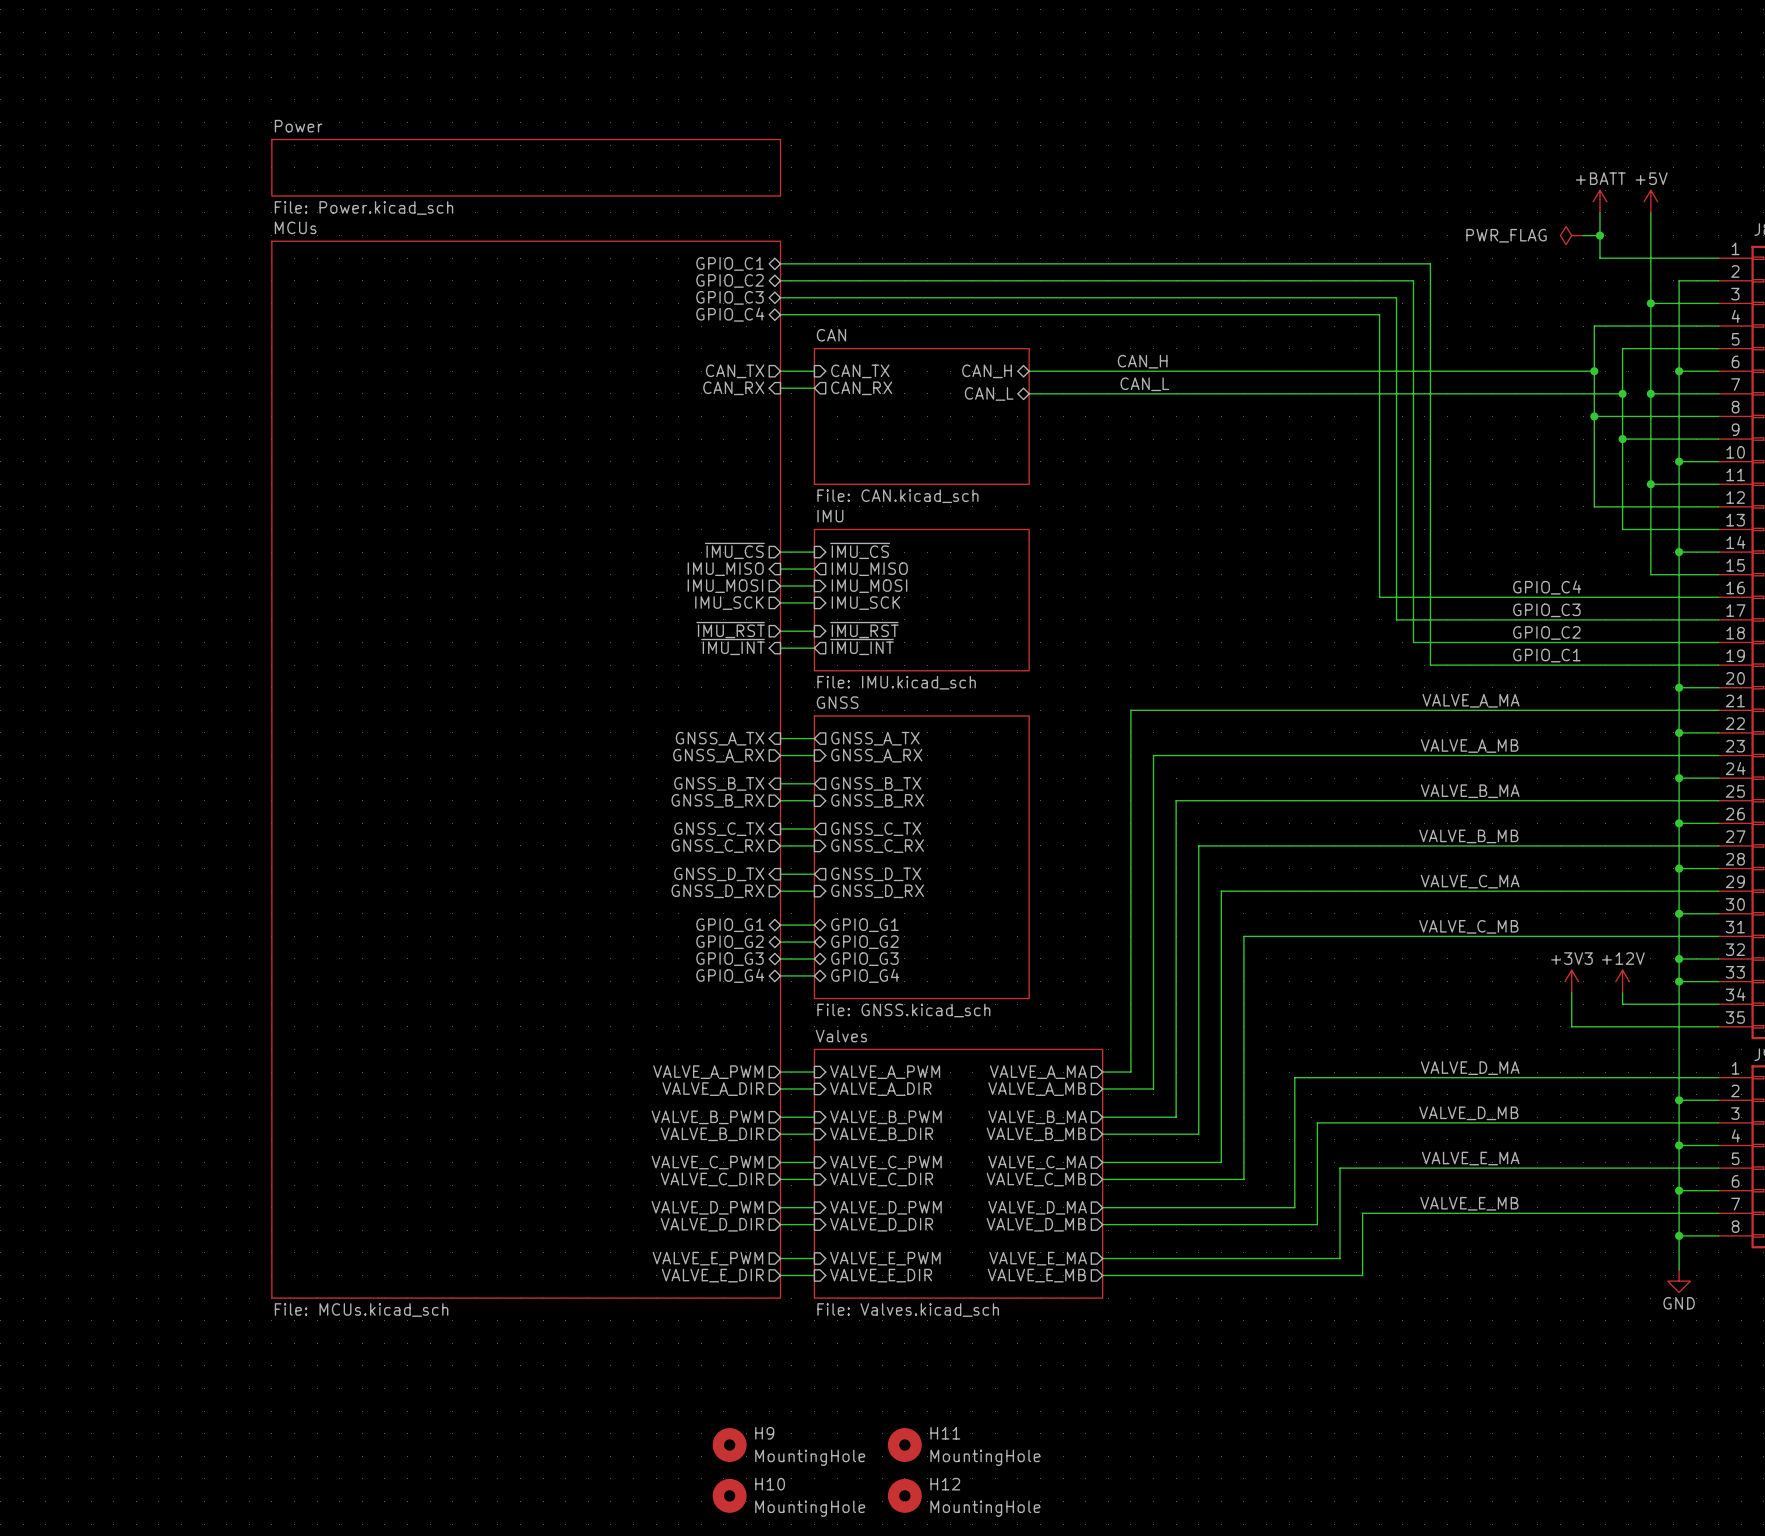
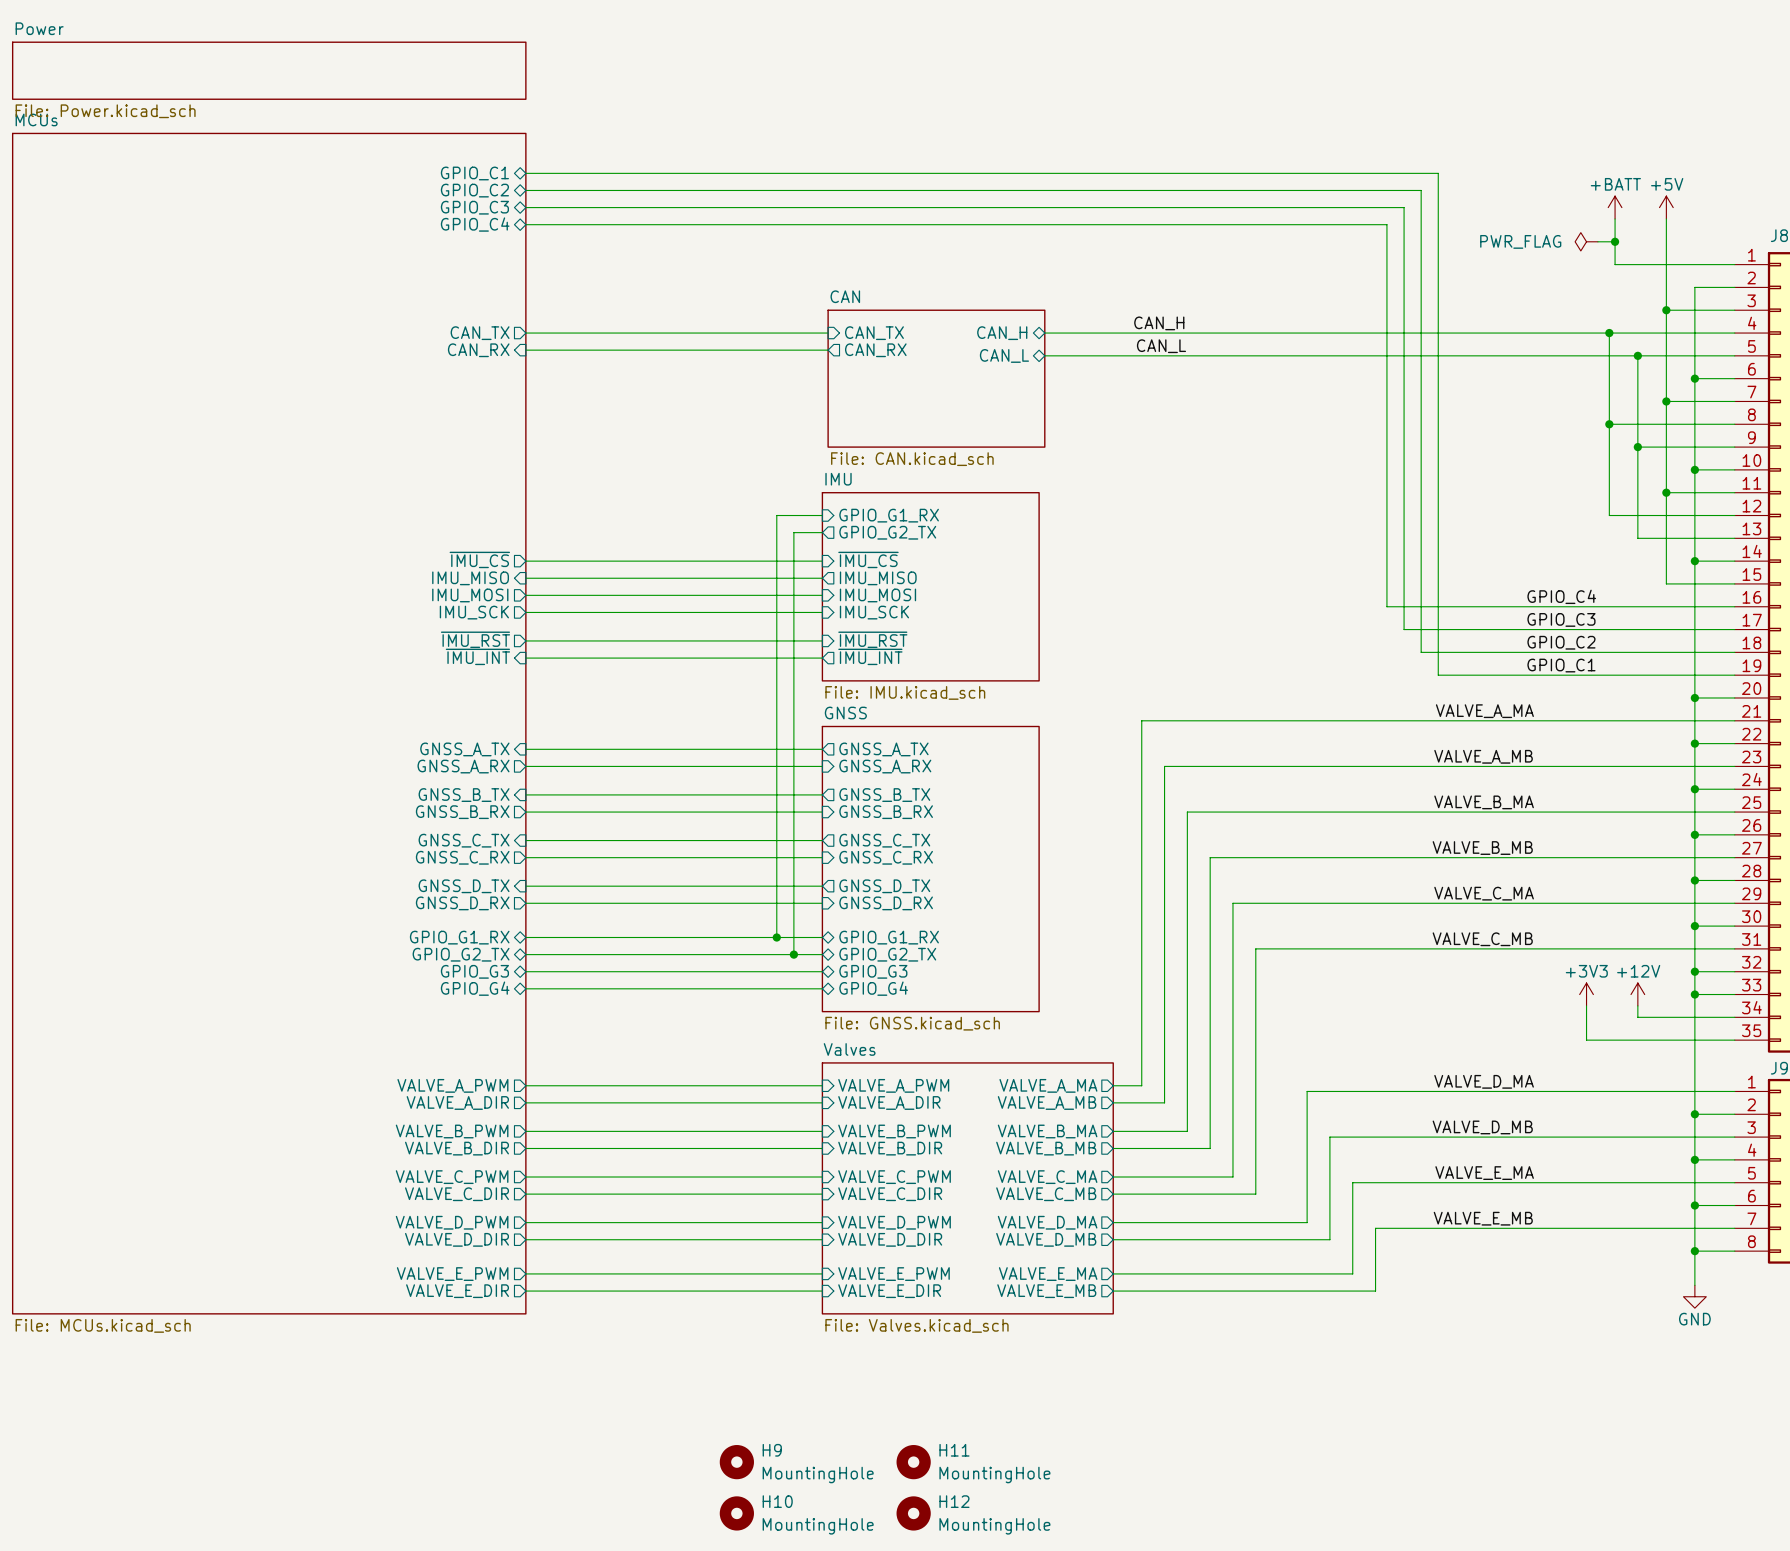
sheet Power: none -> File: Power.kicad_sch (269, 70)
sheet pin: none -> GPIO_C1 (474, 173)
sheet Power: File: Power.kicad_sch (526, 167) -> none
sheet pin: none -> GPIO_C2 (474, 190)
sheet pin: none -> GPIO_C3 (474, 207)
sheet pin: none -> GPIO_C4 (475, 224)
sheet pin: GPIO_C1 (730, 263) -> none
wire: (780, 263) (1430, 263) (1430, 665) -> (525, 173) (1438, 173) (1438, 675) (1443, 675)
sheet pin: GPIO_C2 (730, 280) -> none
wire: (780, 280) (1413, 280) (1413, 642) -> (525, 190) (1421, 190) (1421, 652) (1426, 652)
sheet pin: GPIO_C3 (730, 297) -> none
wire: (780, 297) (1396, 297) (1396, 619) -> (525, 207) (1404, 207) (1404, 629) (1409, 629)
sheet pin: GPIO_C4 (730, 314) -> none
wire: (780, 314) (1379, 314) (1379, 597) -> (525, 224) (1386, 224) (1386, 606) (1392, 606)
sheet pin: none -> CAN_TX (480, 333)
wire: none -> (525, 333) (828, 333)
sheet pin: none -> CAN_TX (874, 333)
wire: none -> (1044, 333) (1609, 333)
junction: none -> (1609, 333)
wire: none -> (525, 350) (828, 350)
sheet pin: none -> CAN_RX (478, 350)
sheet pin: none -> CAN_RX (875, 350)
wire: none -> (1044, 355) (1637, 355)
junction: none -> (1637, 355)
label position: CAN_H (1142, 361) -> CAN_H (1159, 323)
sheet pin: CAN_TX (735, 371) -> none
wire: (780, 371) (814, 371) -> none
sheet pin: CAN_TX (860, 371) -> none
sheet pin position: CAN_H (987, 371) -> CAN_H (1002, 333)
wire: (1029, 371) (1594, 371) -> none
junction: (1594, 371) -> none
label position: CAN_L (1144, 384) -> CAN_L (1161, 346)
sheet pin: CAN_RX (733, 388) -> none
wire: (780, 388) (814, 388) -> none
sheet pin: CAN_RX (861, 388) -> none
sheet pin position: CAN_L (989, 393) -> CAN_L (1004, 355)
wire: (1029, 393) (1622, 393) -> none
junction: (1622, 393) -> none
sheet CAN position: (921, 416) -> (936, 378)
wire: none -> (822, 515) (776, 515) (776, 937)
sheet pin: none -> GPIO_G1_RX (889, 515)
wire: none -> (822, 532) (793, 532) (793, 954)
sheet pin: none -> GPIO_G2_TX (887, 532)
sheet pin: none -> ~{IMU_CS} (479, 559)
sheet pin: ~{IMU_CS} (734, 550) -> none
wire: none -> (525, 561) (788, 561)
sheet pin: none -> IMU_MISO (470, 578)
wire: none -> (525, 578) (788, 578)
sheet pin: IMU_MISO (725, 569) -> none
sheet IMU: none -> File: IMU.kicad_sch (930, 586)
wire: none -> (525, 595) (788, 595)
sheet pin: none -> IMU_MOSI (470, 595)
sheet pin: IMU_MOSI (725, 586) -> none
sheet IMU: File: IMU.kicad_sch (921, 600) -> none
wire: none -> (525, 612) (788, 612)
sheet pin: none -> IMU_SCK (474, 612)
sheet pin: IMU_SCK (729, 603) -> none
sheet pin: none -> ~{IMU_RST} (475, 639)
sheet pin: ~{IMU_RST} (730, 630) -> none
wire: none -> (525, 640) (788, 640)
sheet pin: none -> ~{IMU_INT} (477, 656)
sheet pin: ~{IMU_INT} (732, 646) -> none
wire: none -> (525, 658) (788, 658)
sheet MCUs: none -> File: MCUs.kicad_sch (269, 723)
sheet pin: none -> GNSS_A_TX (464, 749)
wire: none -> (525, 749) (788, 749)
sheet pin: GNSS_A_TX (720, 738) -> none
sheet pin: none -> GNSS_A_RX (463, 766)
wire: none -> (525, 766) (788, 766)
sheet pin: GNSS_A_RX (718, 755) -> none
sheet MCUs: File: MCUs.kicad_sch (526, 769) -> none
sheet pin: none -> GNSS_B_TX (464, 795)
wire: none -> (525, 794) (788, 794)
sheet pin: GNSS_B_TX (719, 783) -> none
sheet pin: none -> GNSS_B_RX (462, 812)
wire: none -> (525, 812) (788, 812)
sheet pin: GNSS_B_RX (717, 800) -> none
sheet pin: none -> GNSS_C_TX (464, 840)
wire: none -> (525, 840) (788, 840)
sheet pin: GNSS_C_TX (719, 829) -> none
wire: none -> (525, 857) (788, 857)
sheet pin: none -> GNSS_C_RX (462, 857)
sheet pin: GNSS_C_RX (717, 846) -> none
sheet pin: none -> GNSS_D_TX (464, 886)
wire: none -> (525, 886) (788, 886)
sheet pin: GNSS_D_TX (719, 874) -> none
sheet pin: none -> GNSS_D_RX (462, 903)
wire: none -> (525, 903) (788, 903)
sheet pin: GNSS_D_RX (717, 891) -> none
sheet pin: none -> GPIO_G1_RX (459, 937)
wire: none -> (525, 937) (788, 937)
sheet pin: GPIO_G1 (730, 925) -> none
junction: none -> (776, 937)
sheet pin: GPIO_G1 (864, 925) -> GPIO_G1_RX (889, 937)
sheet pin: none -> GPIO_G2_TX (461, 954)
wire: none -> (525, 954) (788, 954)
sheet pin: GPIO_G2 (730, 942) -> none
junction: none -> (793, 954)
sheet pin: GPIO_G2 (864, 942) -> GPIO_G2_TX (887, 954)
wire: none -> (525, 971) (788, 971)
sheet pin: none -> GPIO_G3 (474, 971)
sheet pin: GPIO_G3 (730, 959) -> none
sheet pin: none -> GPIO_G4 (475, 988)
wire: none -> (525, 988) (788, 988)
sheet pin: GPIO_G4 (730, 975) -> none
sheet pin: none -> VALVE_A_PWM (452, 1085)
wire: none -> (525, 1085) (788, 1085)
sheet pin: VALVE_A_PWM (708, 1072) -> none
wire: none -> (525, 1102) (788, 1102)
sheet pin: none -> VALVE_A_DIR (457, 1102)
sheet pin: VALVE_A_DIR (713, 1089) -> none
sheet pin: none -> VALVE_B_PWM (452, 1131)
wire: none -> (525, 1131) (788, 1131)
sheet pin: VALVE_B_PWM (707, 1117) -> none
sheet pin: none -> VALVE_B_DIR (457, 1148)
wire: none -> (525, 1148) (788, 1148)
sheet pin: VALVE_B_DIR (712, 1134) -> none
sheet pin: none -> VALVE_C_PWM (452, 1177)
wire: none -> (525, 1177) (788, 1177)
sheet pin: VALVE_C_PWM (707, 1162) -> none
sheet pin: none -> VALVE_C_DIR (457, 1194)
wire: none -> (525, 1194) (788, 1194)
sheet pin: VALVE_C_DIR (712, 1179) -> none
sheet pin: none -> VALVE_D_PWM (452, 1222)
wire: none -> (525, 1222) (788, 1222)
sheet pin: VALVE_D_PWM (707, 1207) -> none
sheet pin: none -> VALVE_D_DIR (457, 1239)
wire: none -> (525, 1239) (788, 1239)
sheet pin: VALVE_D_DIR (712, 1224) -> none
sheet pin: none -> VALVE_E_PWM (452, 1274)
wire: none -> (525, 1273) (788, 1273)
sheet pin: VALVE_E_PWM (707, 1258) -> none
sheet pin: none -> VALVE_E_DIR (457, 1291)
wire: none -> (525, 1291) (788, 1291)
sheet pin: VALVE_E_DIR (712, 1275) -> none

